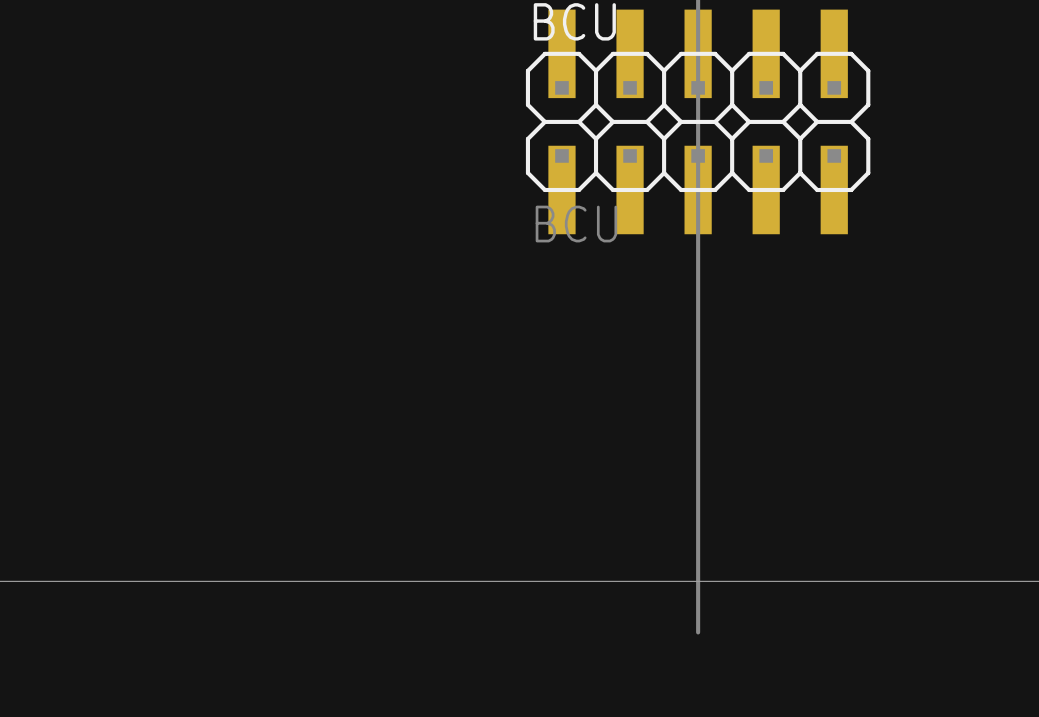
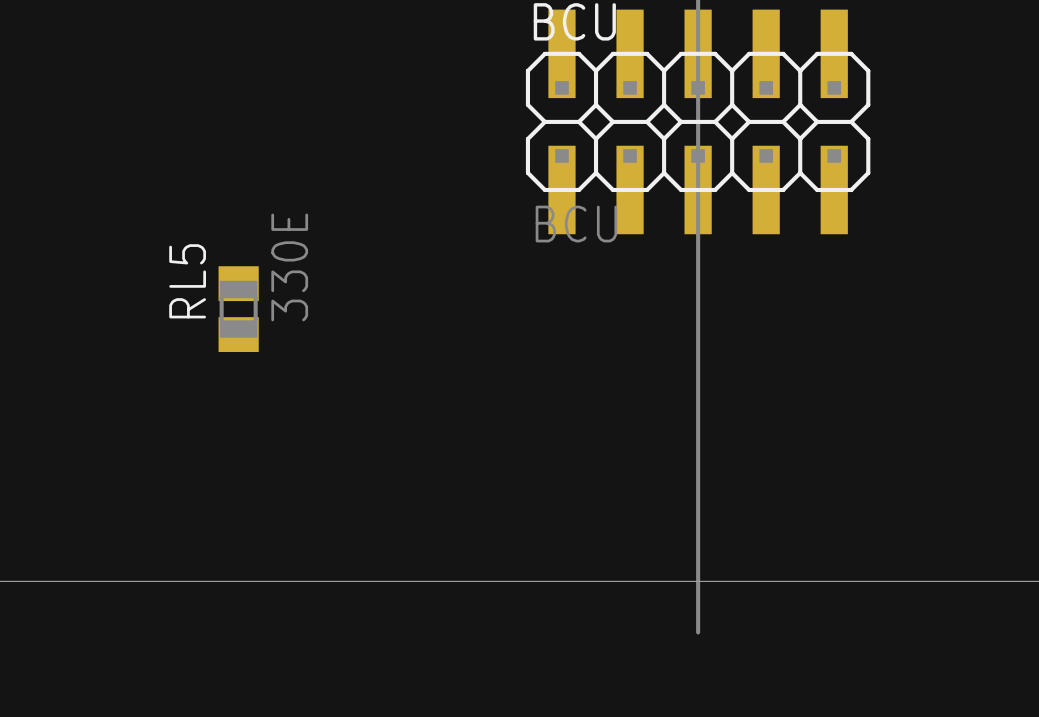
RL5: none -> 330E (238, 309)

